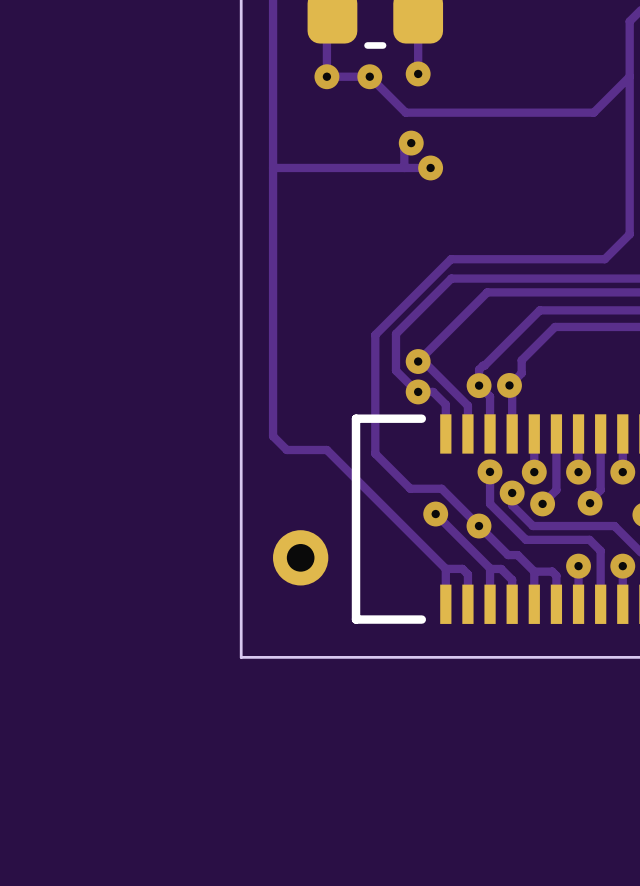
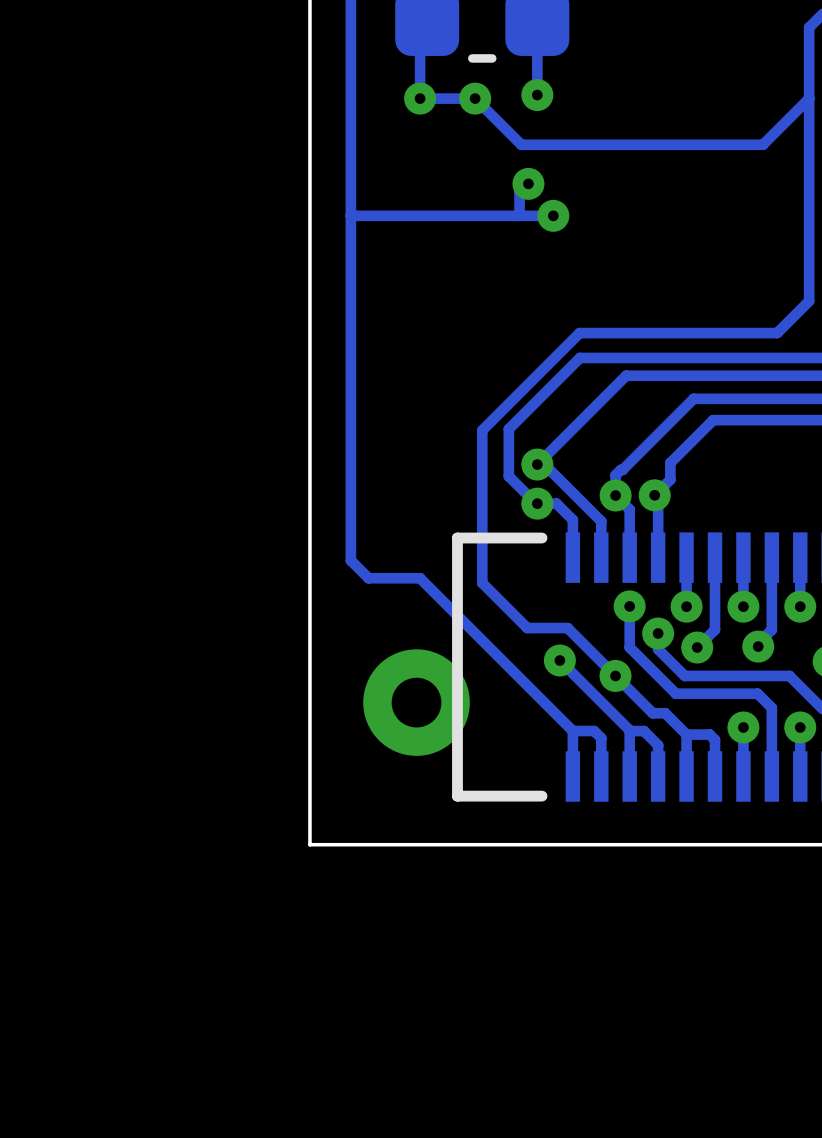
part footprint: [273, 530, 329, 586] -> [363, 649, 470, 756]

